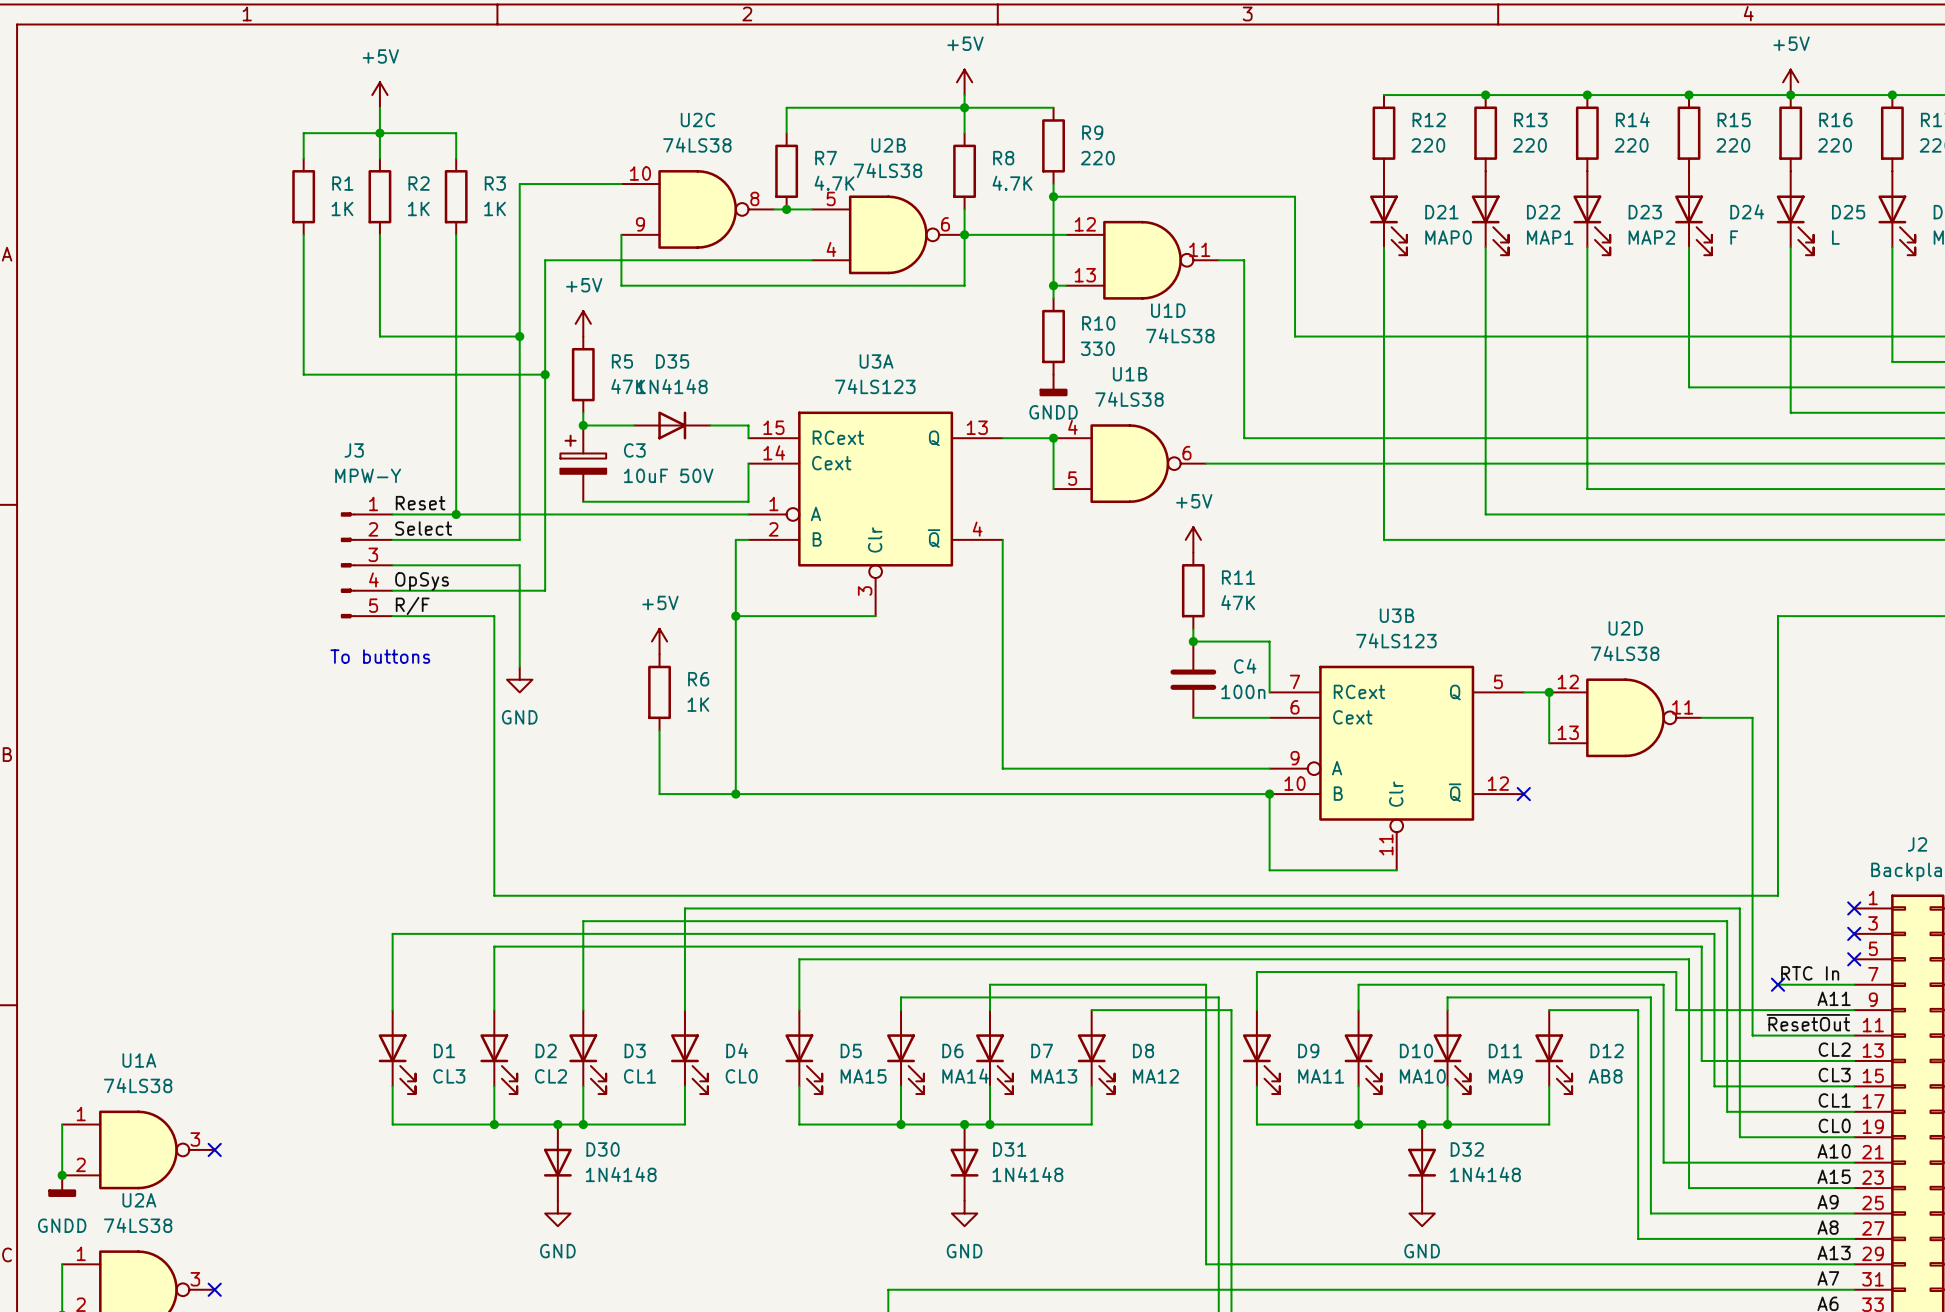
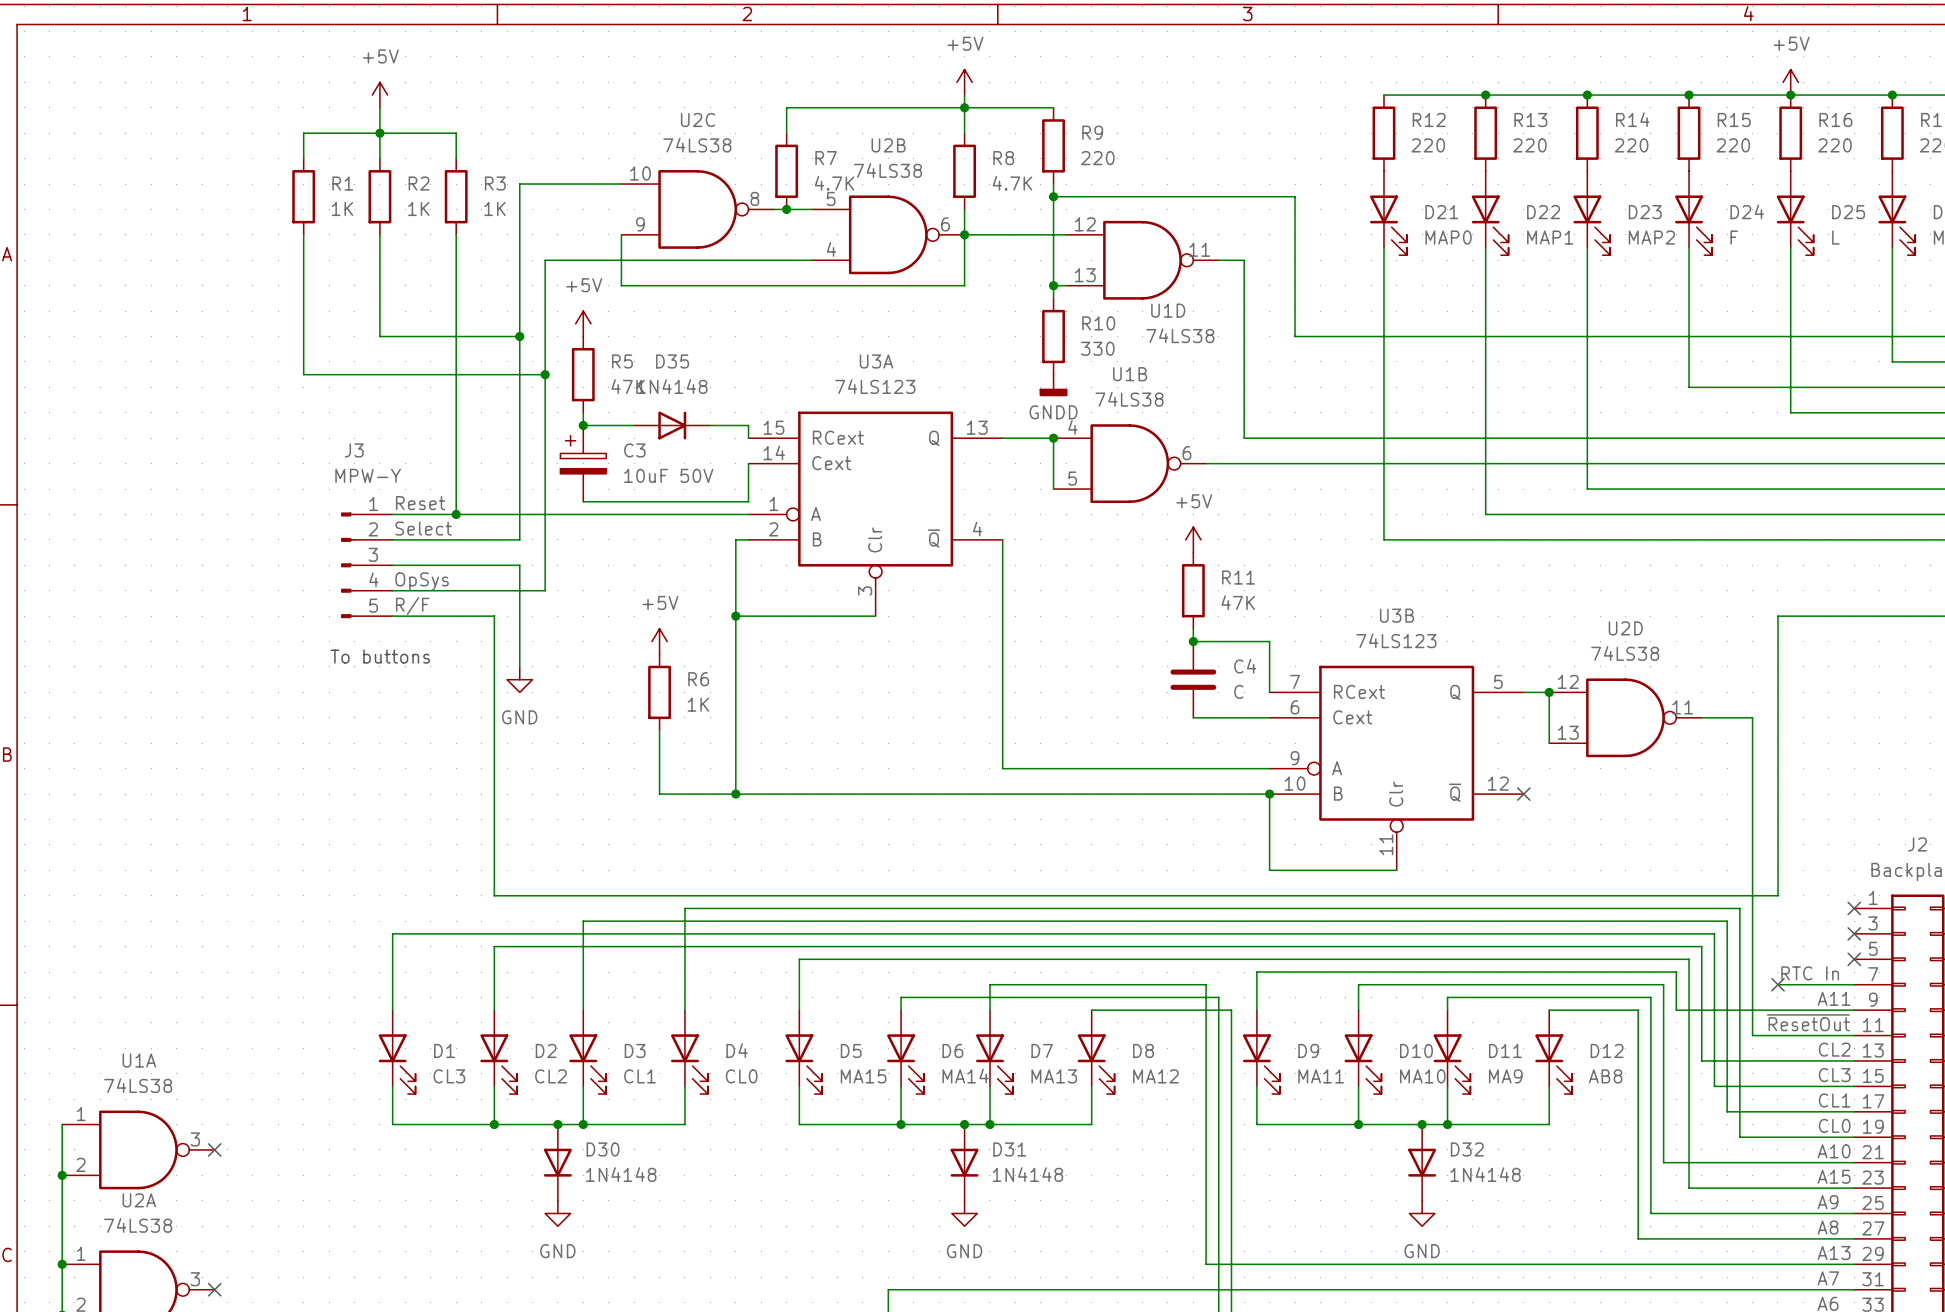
C4 value: 100n (1243, 691) -> C (1238, 691)
wire: none -> (62, 1175) (62, 1264)
power symbol: GNDD (62, 1186) -> none
junction: none -> (62, 1264)

